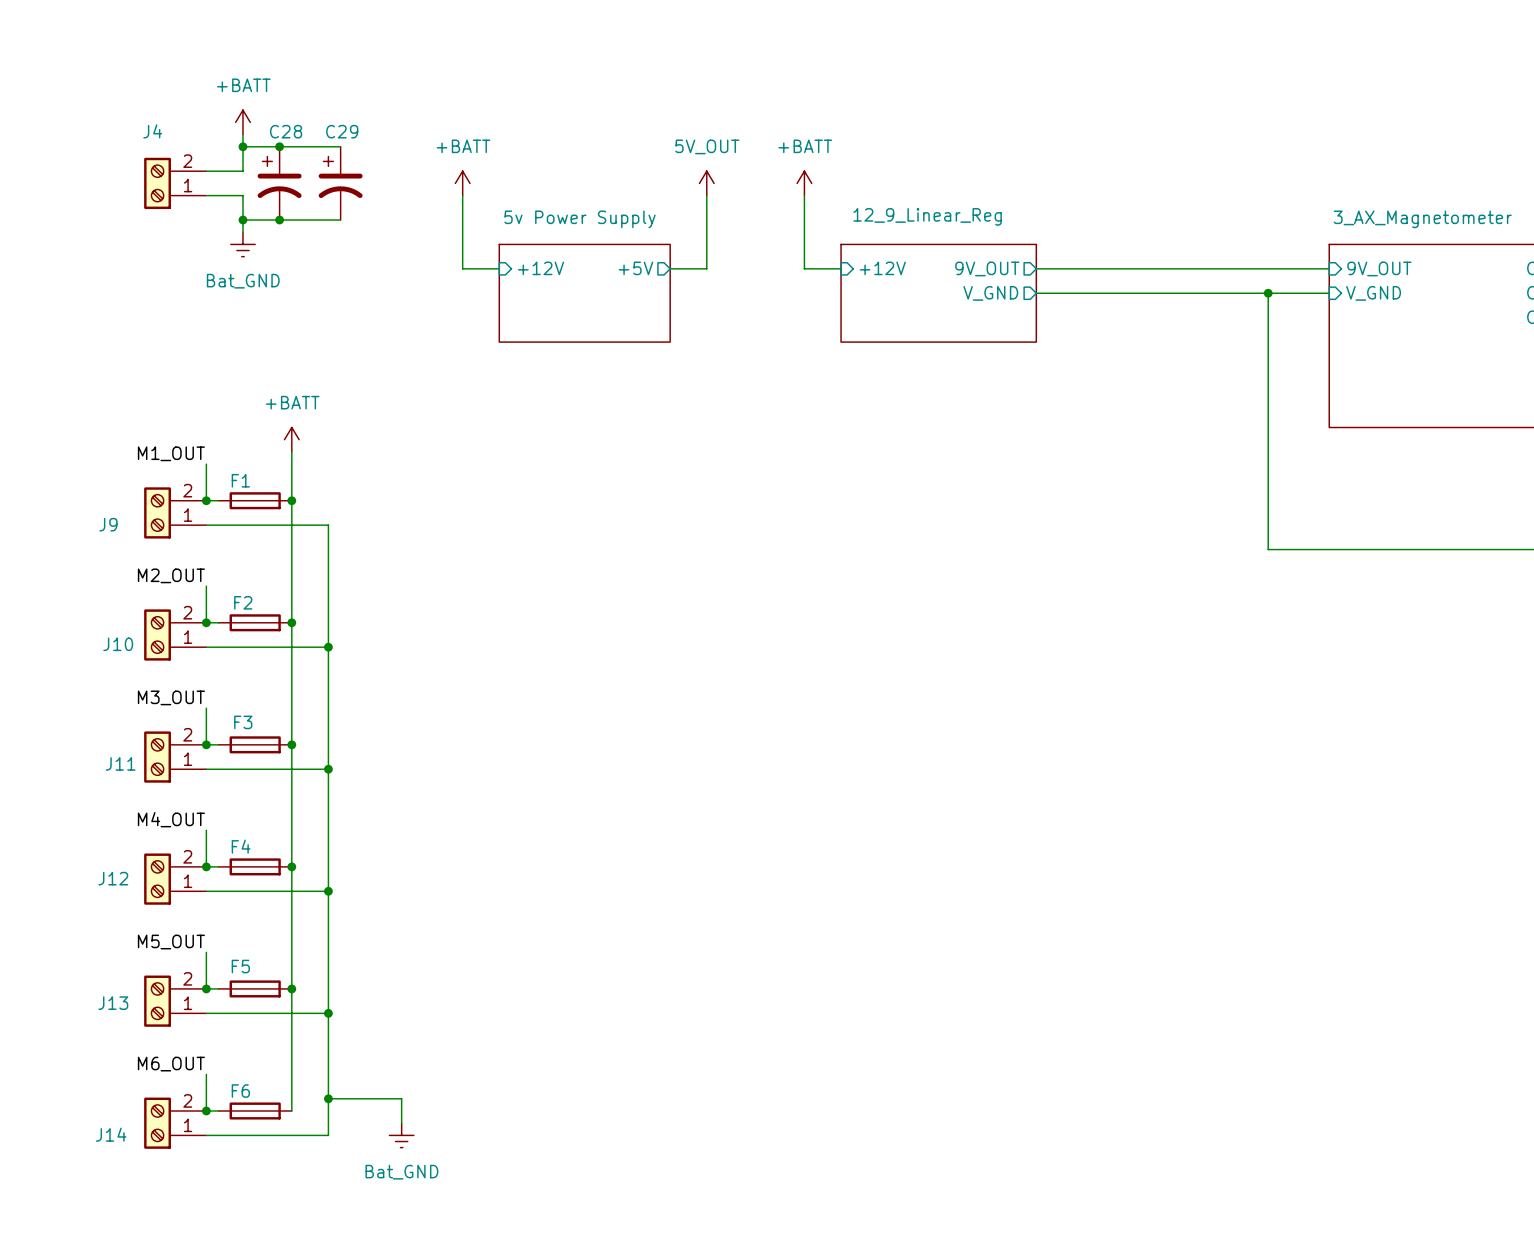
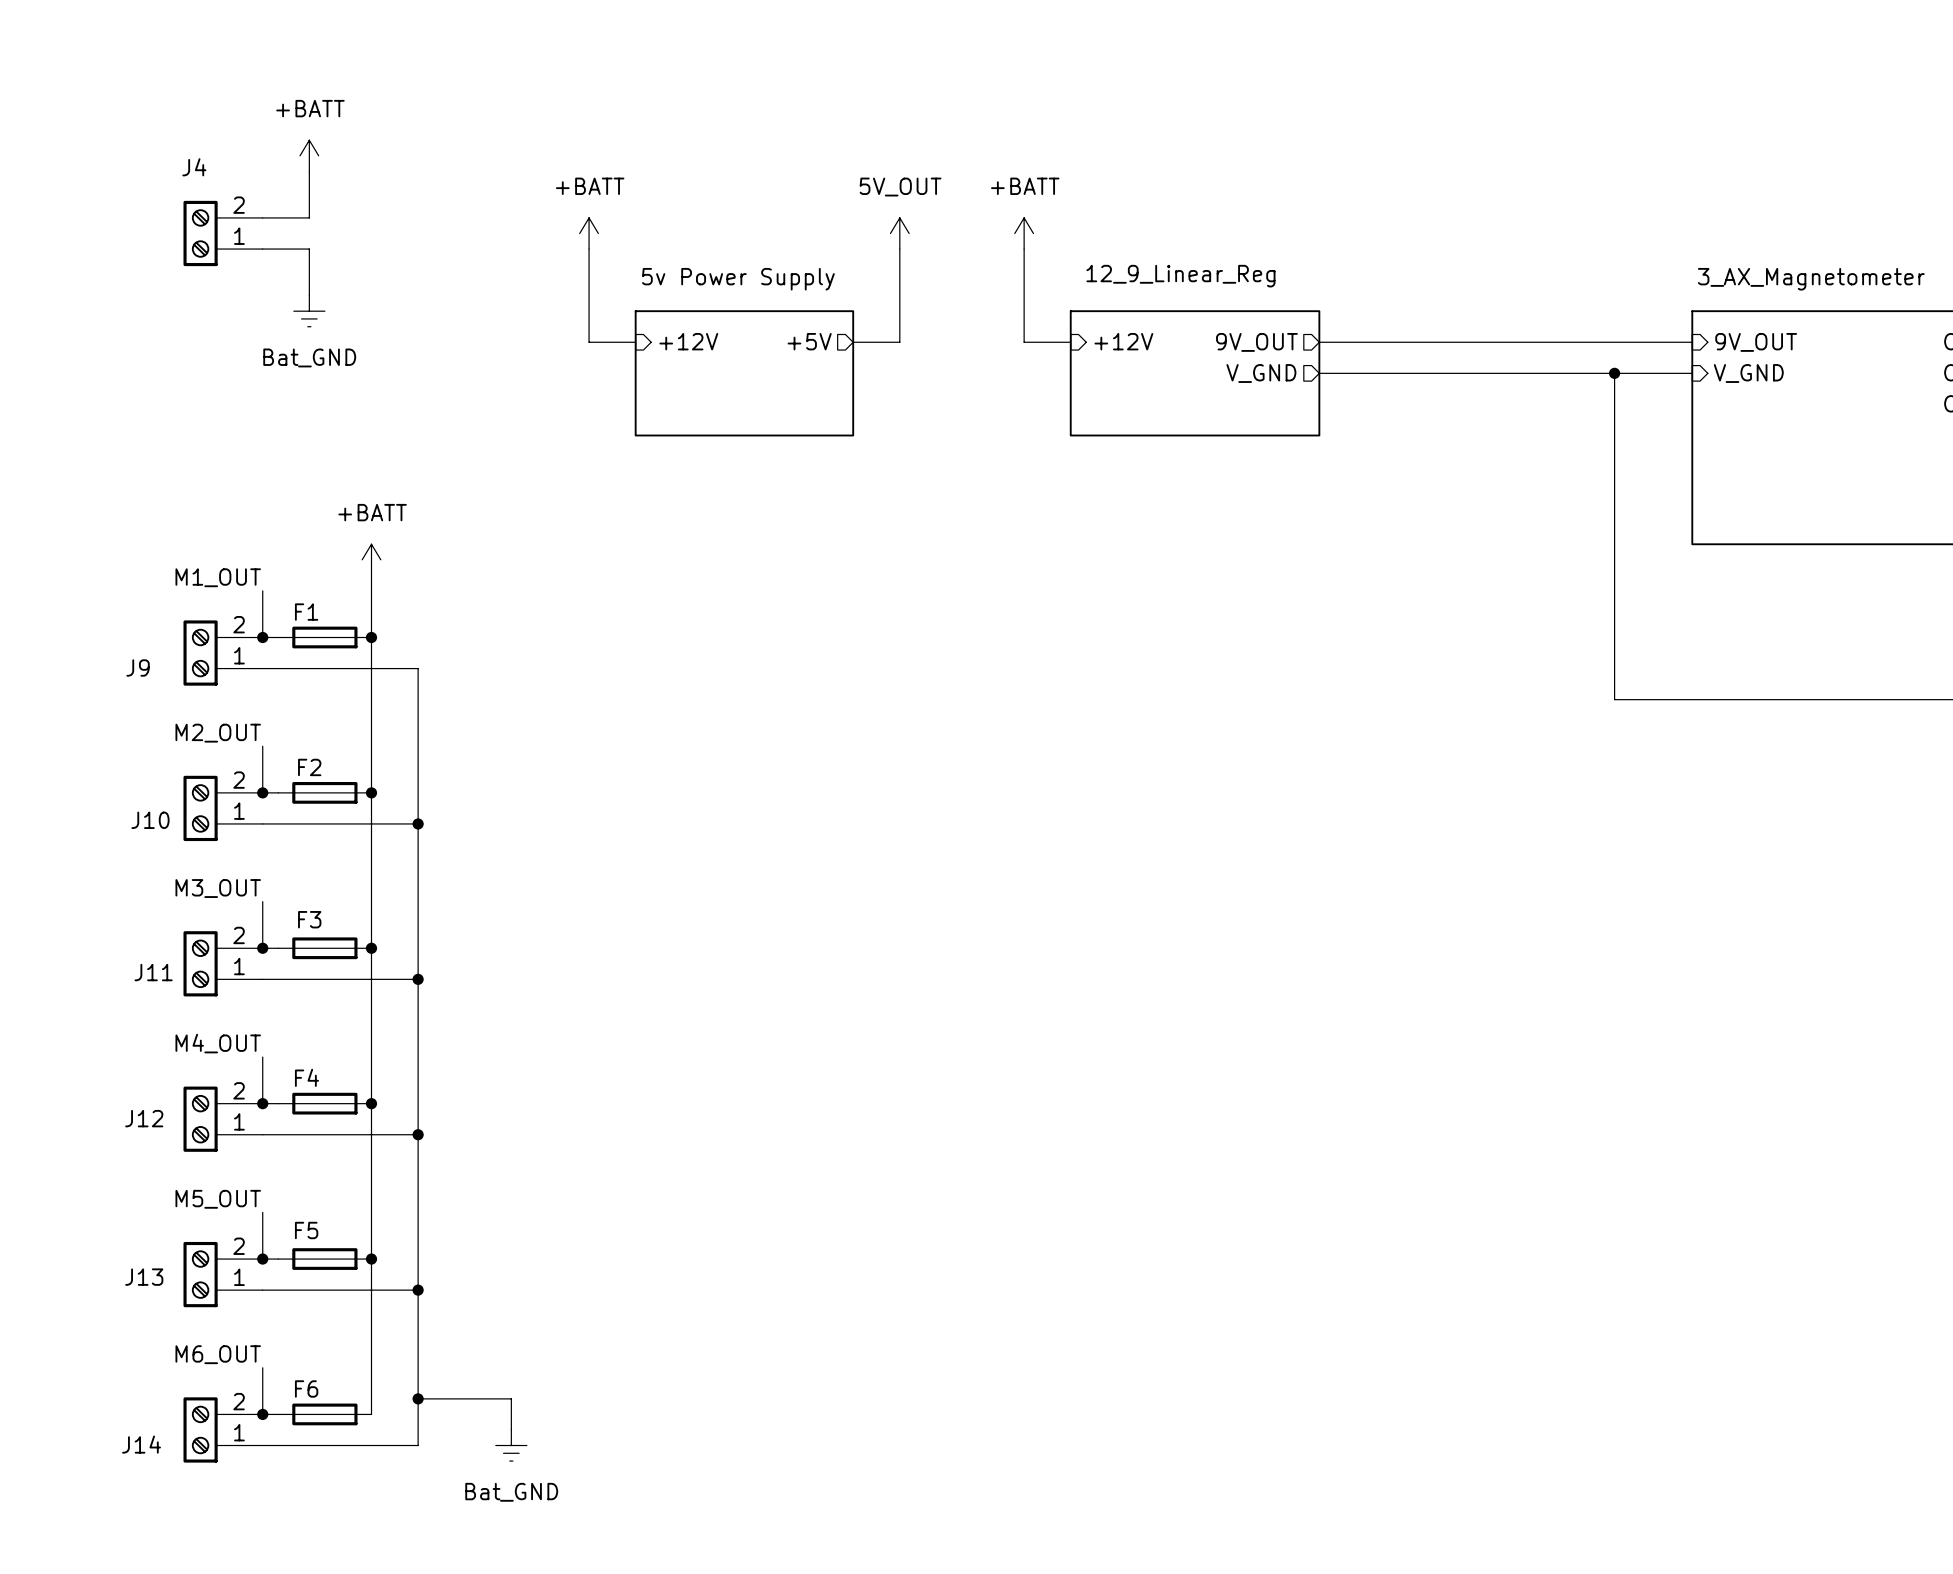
wire: (242, 146) (340, 146) -> none
junction: (242, 146) -> none
junction: (279, 146) -> none
C28: (279, 183) -> none
C29: (340, 183) -> none
wire: (242, 220) (340, 220) -> none
junction: (242, 220) -> none
junction: (279, 220) -> none

